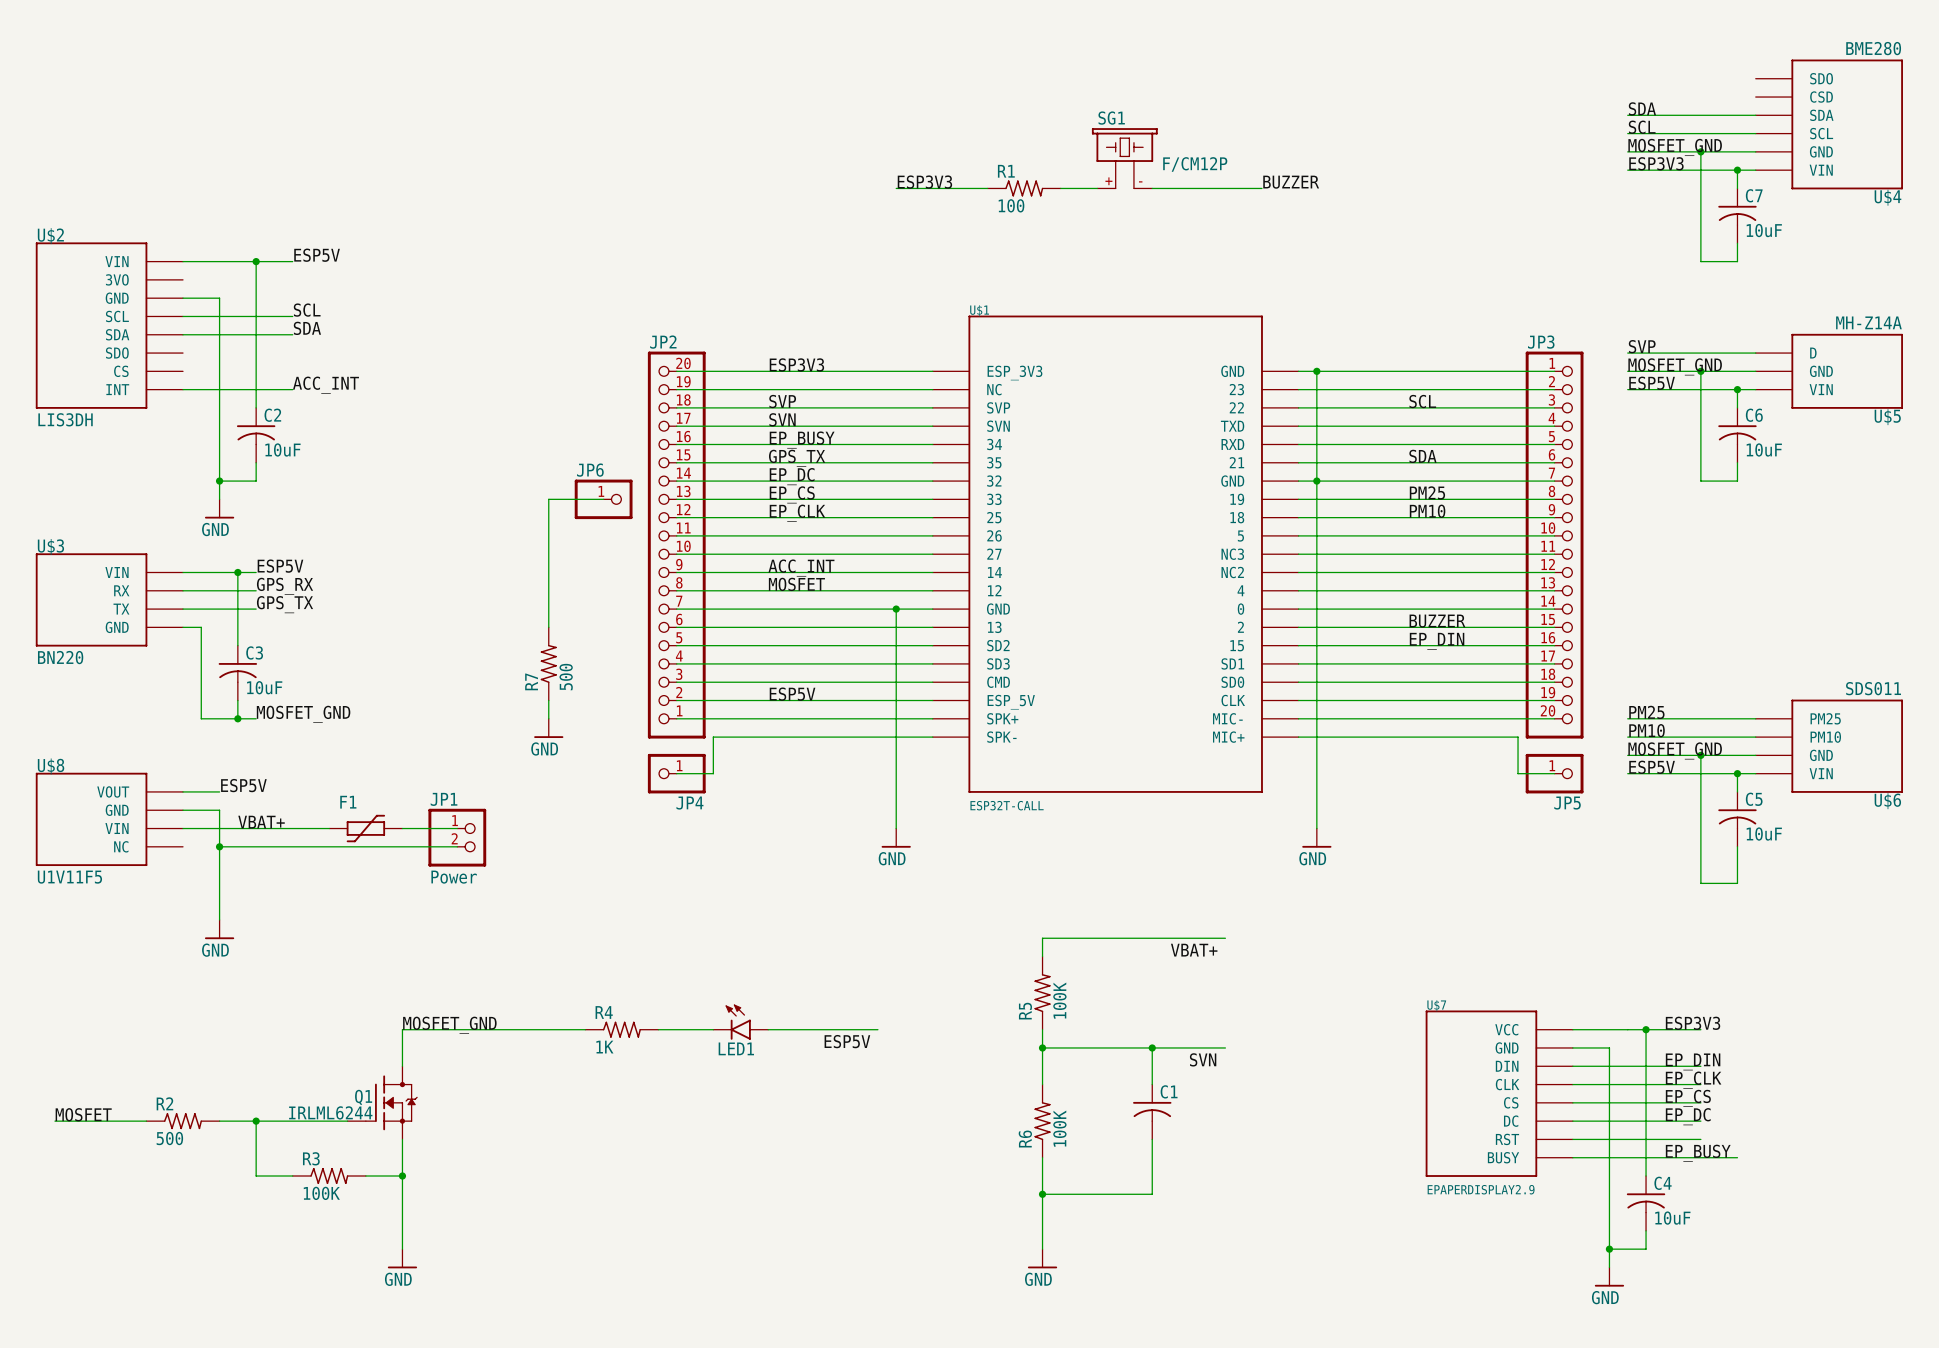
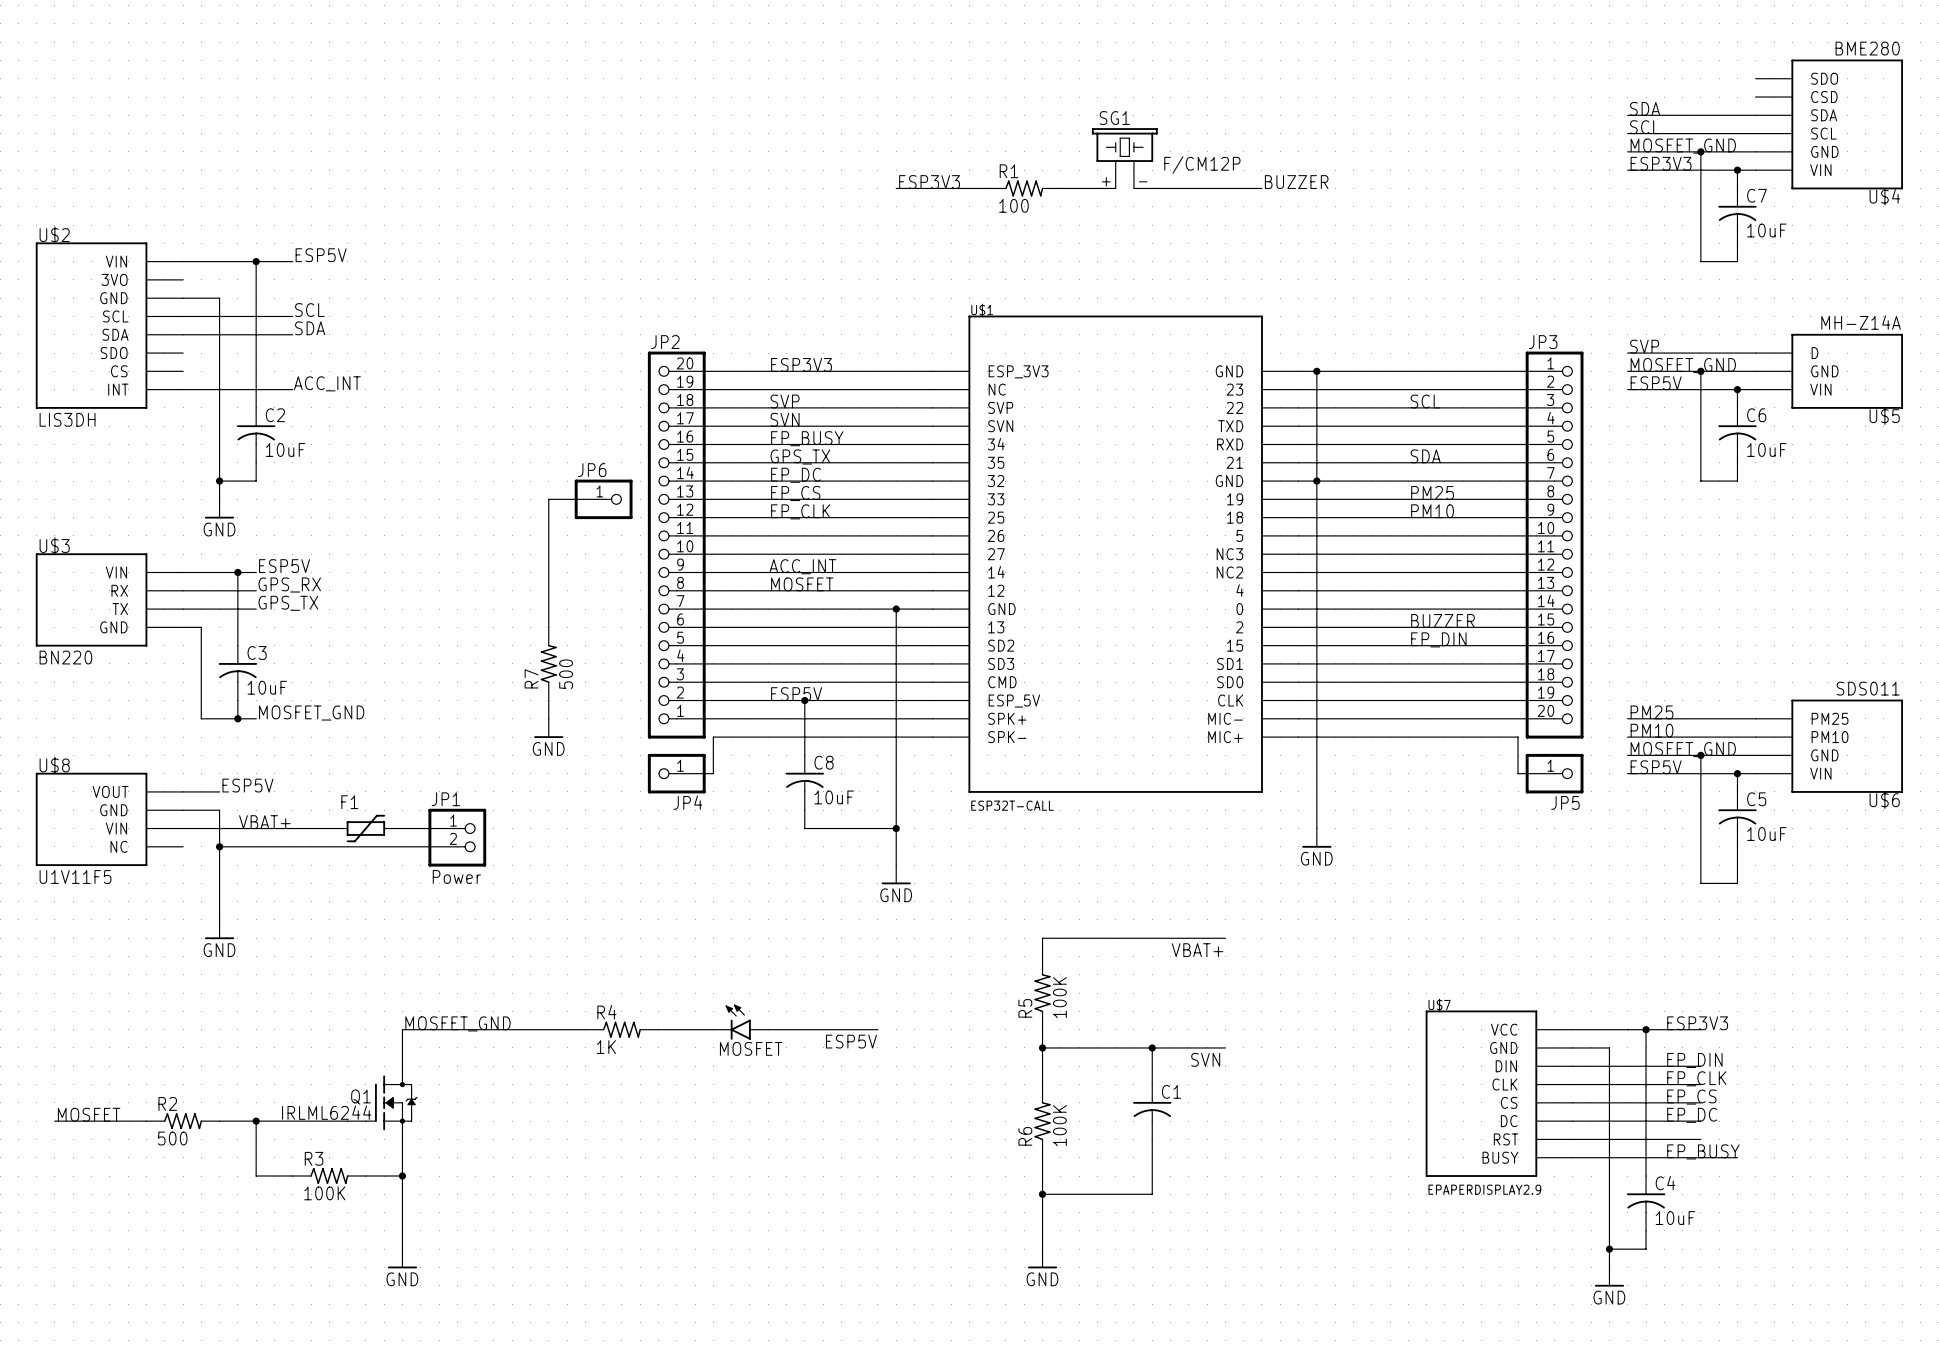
wire: none -> (804, 700) (804, 755)
junction: none -> (804, 700)
C8: none -> 10uF (804, 782)
wire: none -> (804, 810) (804, 828) (896, 828) (896, 865)
junction: none -> (896, 828)
power symbol position: GND (896, 838) -> GND (896, 874)
LED1 name: LED1 (736, 1048) -> MOSFET (751, 1048)

